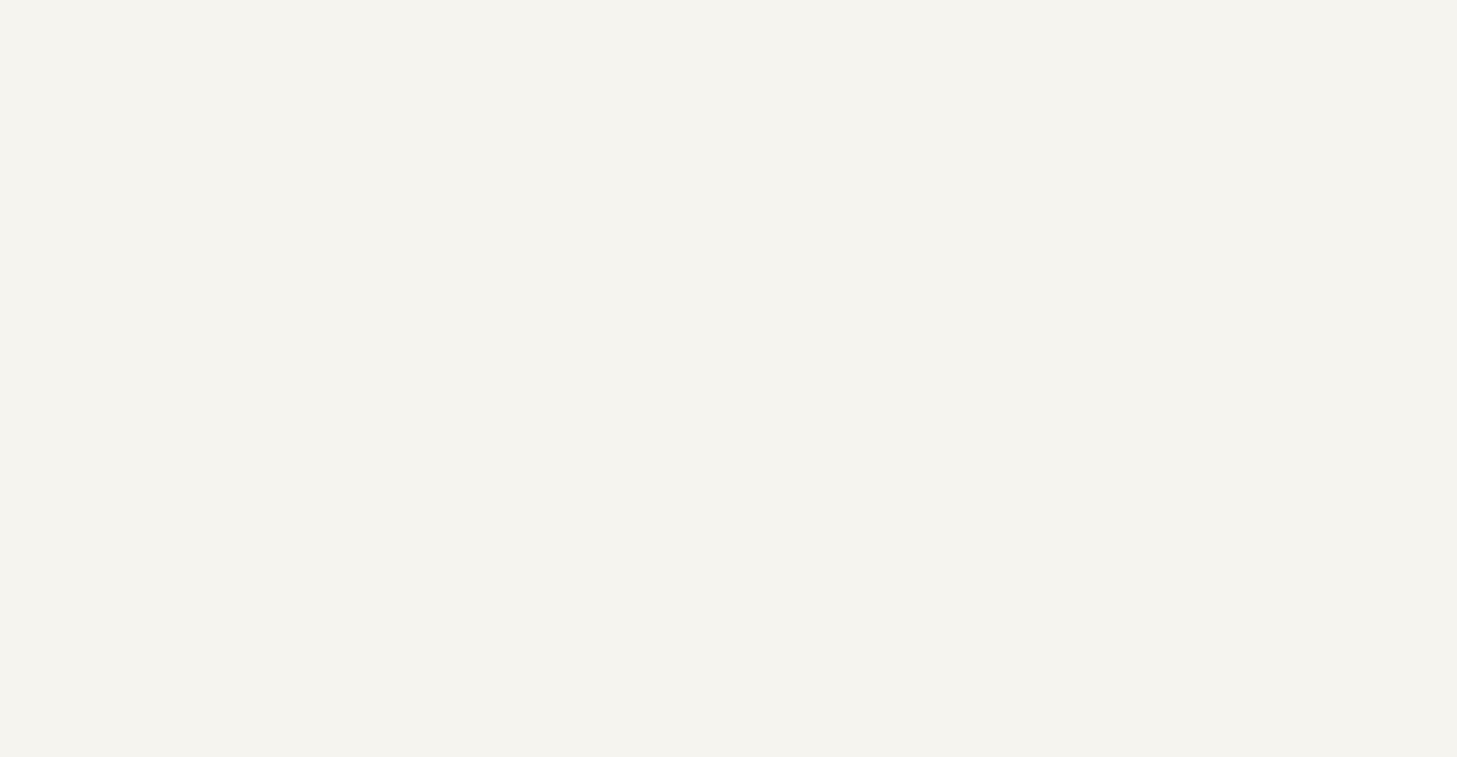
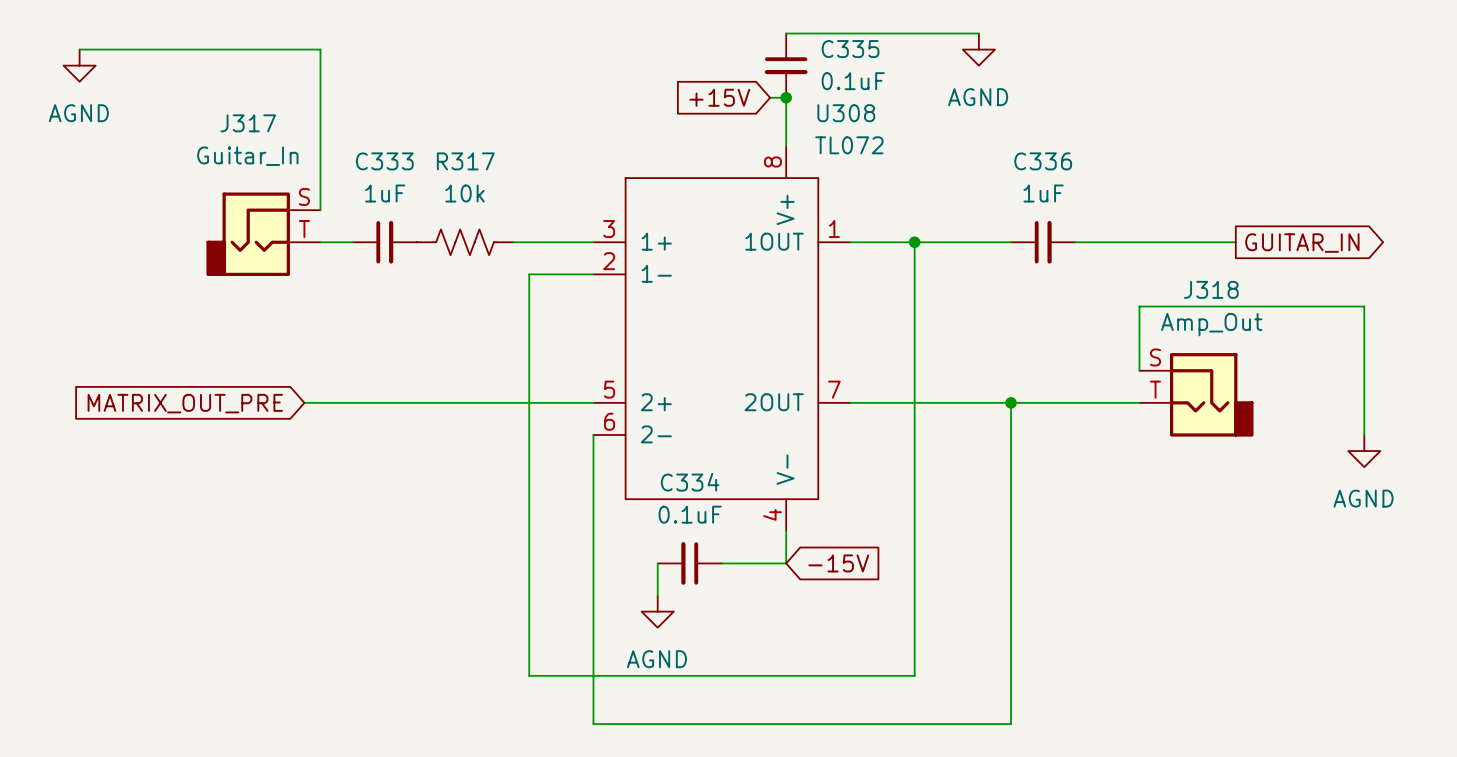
wire: none -> (786, 33) (978, 33)
wire: none -> (79, 49) (320, 49) (320, 210)
power symbol: none -> AGND (978, 49)
power symbol: none -> AGND (79, 65)
C335: none -> 0.1uF (786, 65)
global label: none -> +15V (719, 97)
wire: none -> (770, 97) (786, 97) (786, 145)
junction: none -> (786, 97)
J317: none -> Guitar_In (263, 234)
wire: none -> (320, 242) (352, 242)
C333: none -> 1uF (384, 242)
R317: none -> 10k (465, 242)
wire: none -> (513, 242) (593, 242)
wire: none -> (850, 242) (1011, 242)
wire: none -> (914, 242) (914, 675) (529, 675) (529, 274) (593, 274)
junction: none -> (914, 242)
C336: none -> 1uF (1043, 242)
wire: none -> (1075, 242) (1235, 242)
global label: none -> GUITAR_IN (1302, 243)
U308: none -> TL072 (721, 338)
wire: none -> (1139, 370) (1139, 306) (1364, 306) (1364, 434)
J318: none -> Amp_Out (1196, 394)
wire: none -> (304, 402) (593, 402)
wire: none -> (850, 402) (1139, 402)
wire: none -> (1011, 402) (1011, 724) (593, 724) (593, 434)
junction: none -> (1011, 402)
global label: none -> MATRIX_OUT_PRE (185, 403)
power symbol: none -> AGND (1364, 451)
wire: none -> (786, 531) (786, 563) (721, 563)
wire: none -> (657, 563) (657, 595)
C334: none -> 0.1uF (689, 563)
global label: none -> -15V (838, 563)
power symbol: none -> AGND (657, 611)

